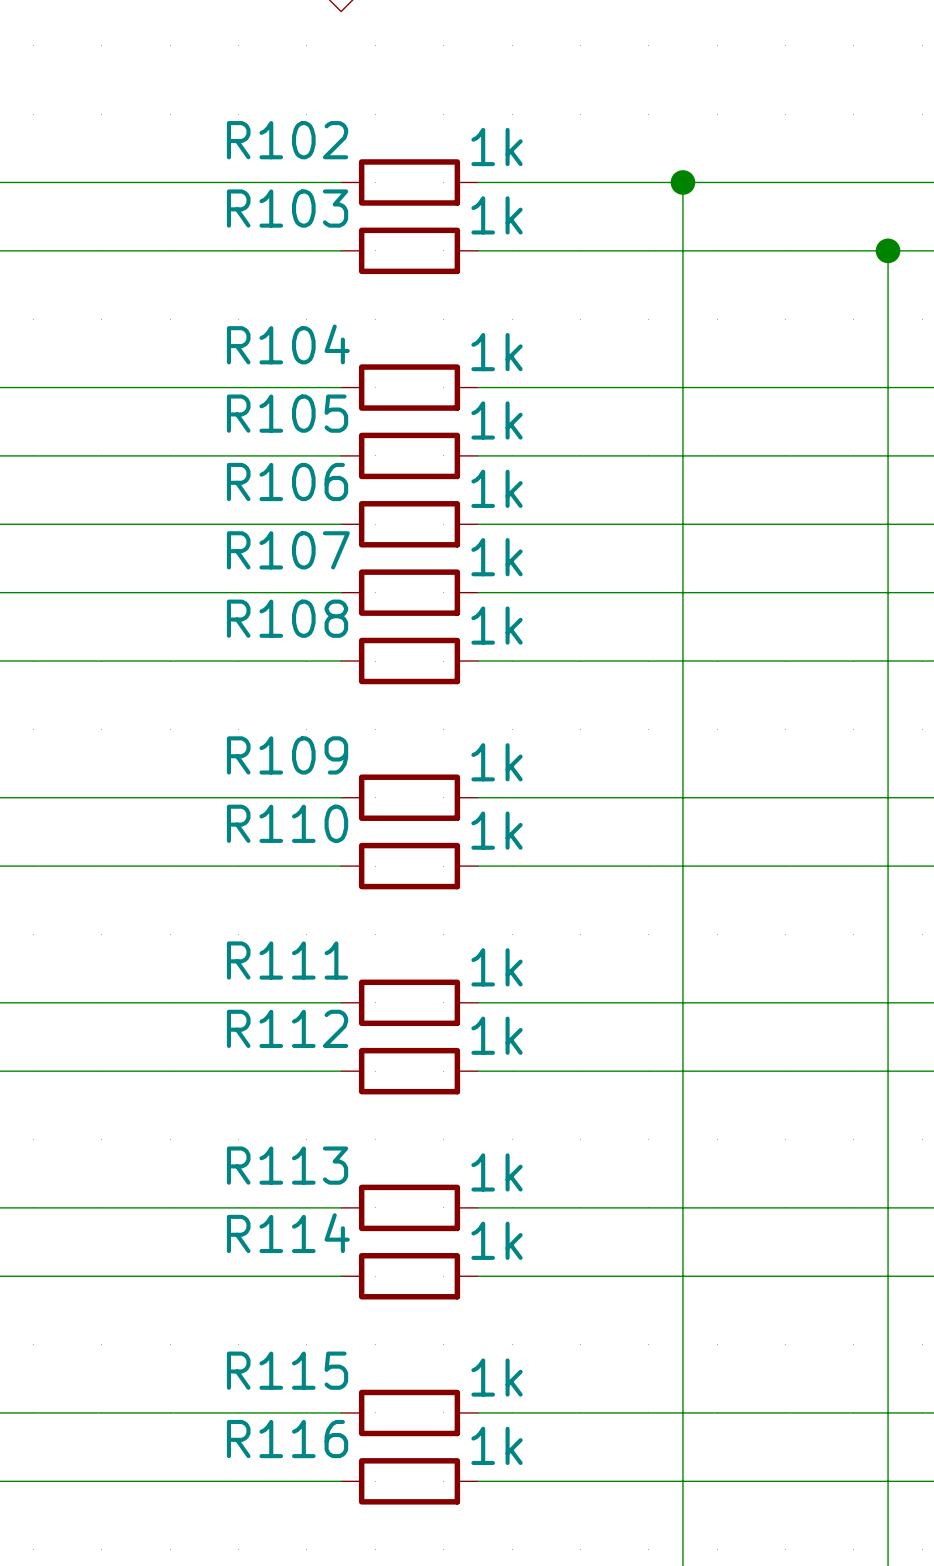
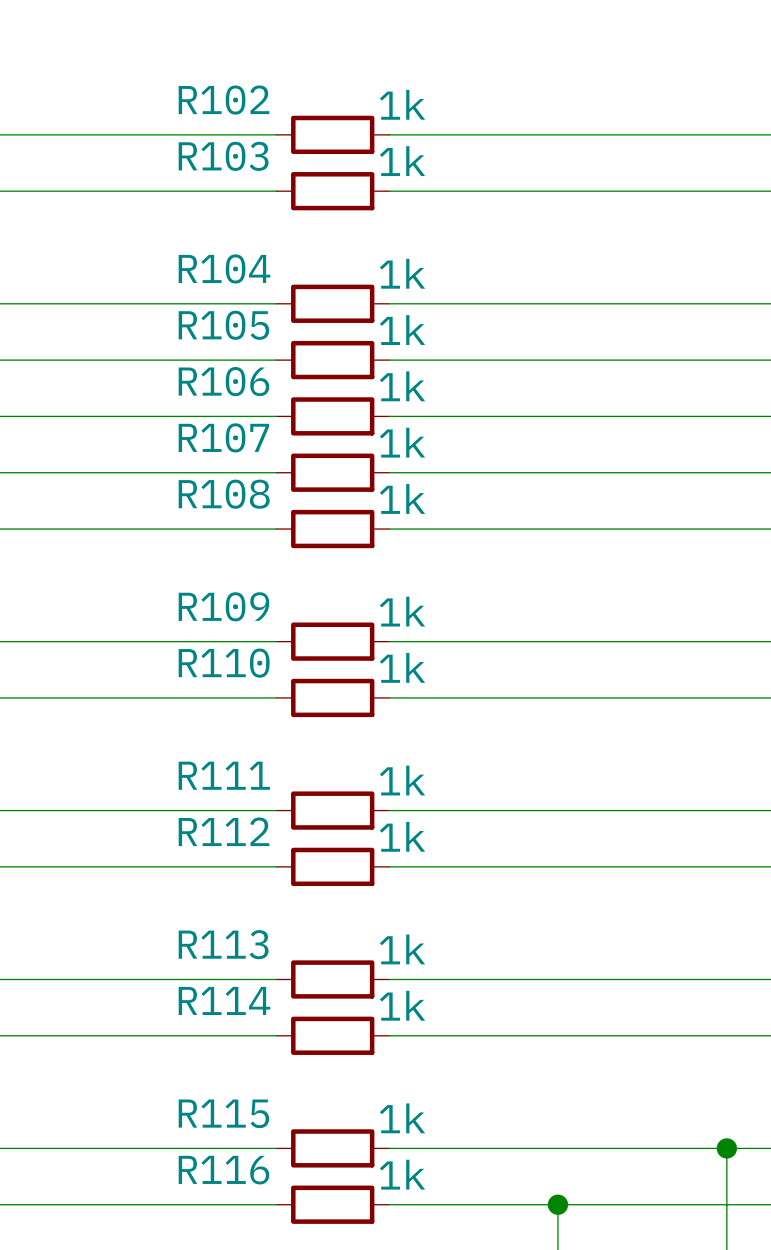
wire: (682, 182) (682, 1481) -> none
junction: (682, 182) -> none
wire: (888, 250) (888, 1412) -> none
junction: (888, 250) -> none
junction: none -> (726, 1148)
junction: none -> (557, 1204)

